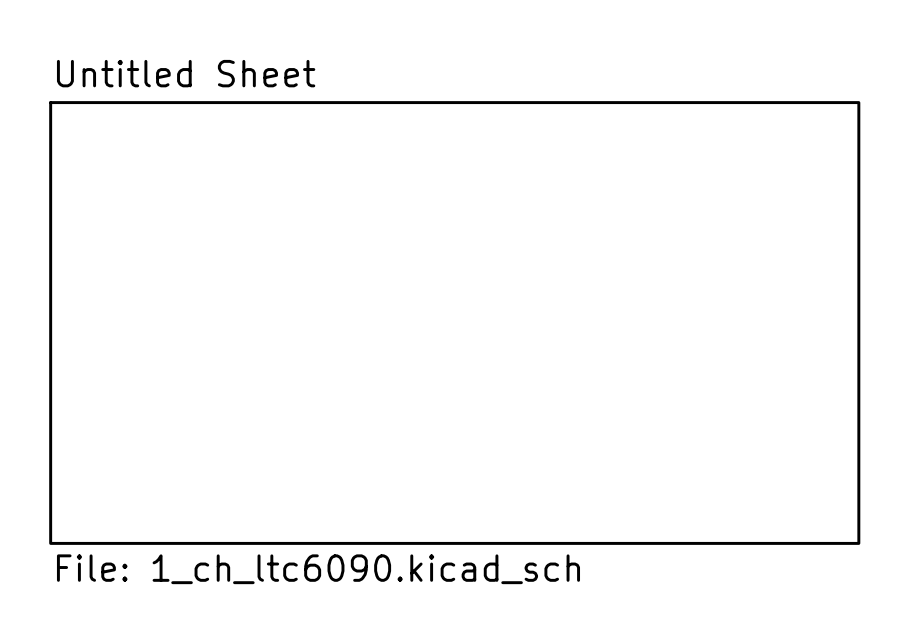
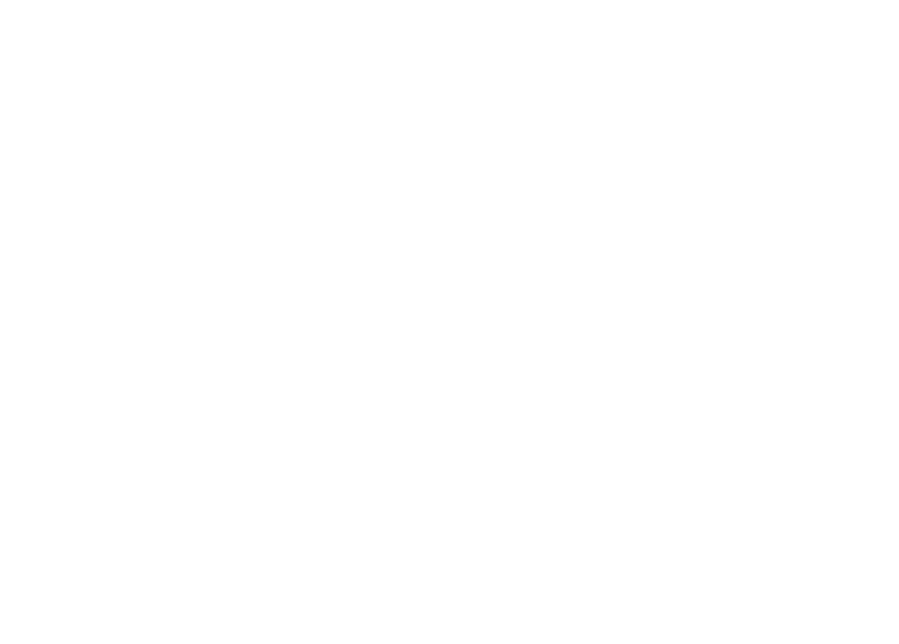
sheet Untitled Sheet: File: 1_ch_ltc6090.kicad_sch (454, 322) -> none

